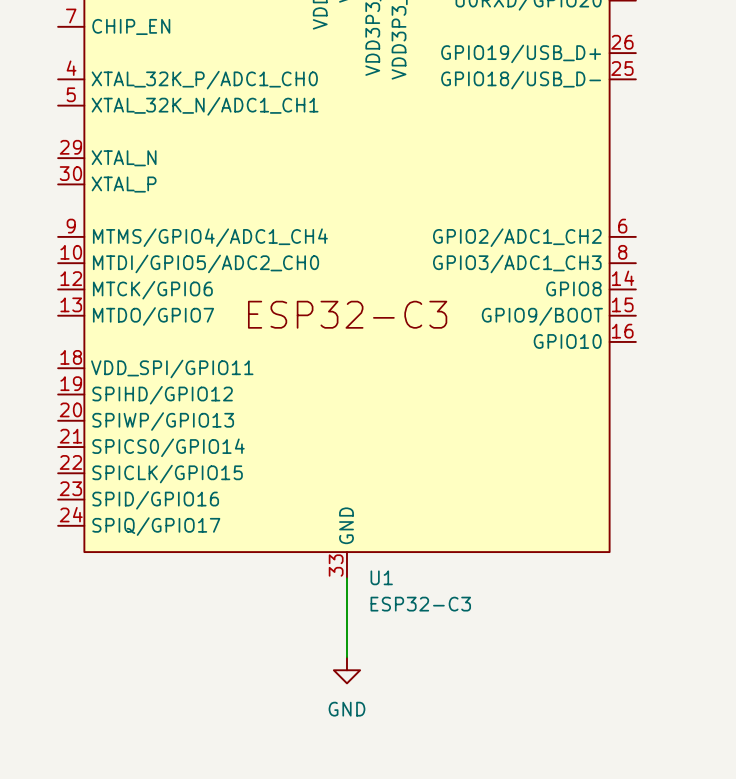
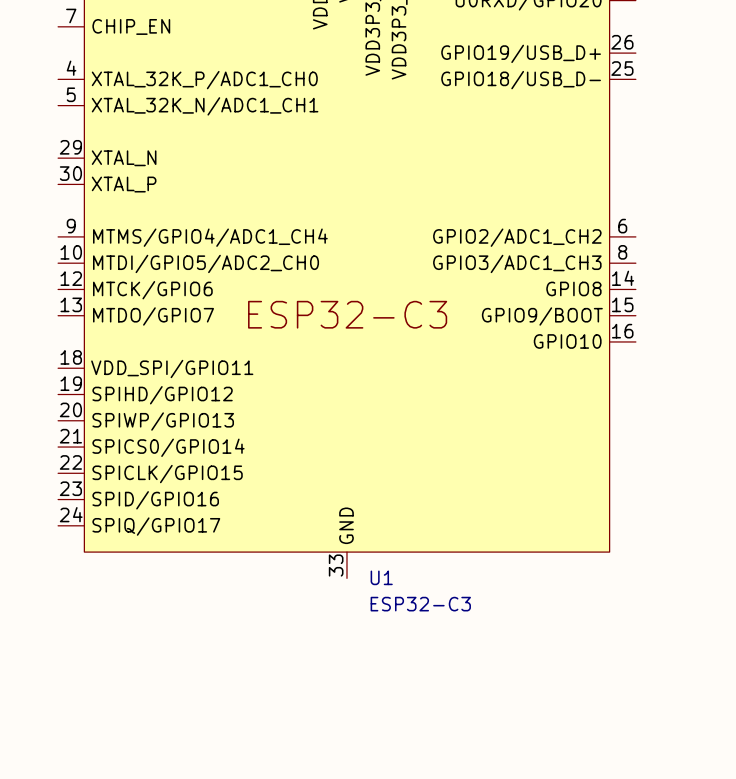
wire: (346, 578) (346, 657) -> none
power symbol: GND (346, 670) -> none

